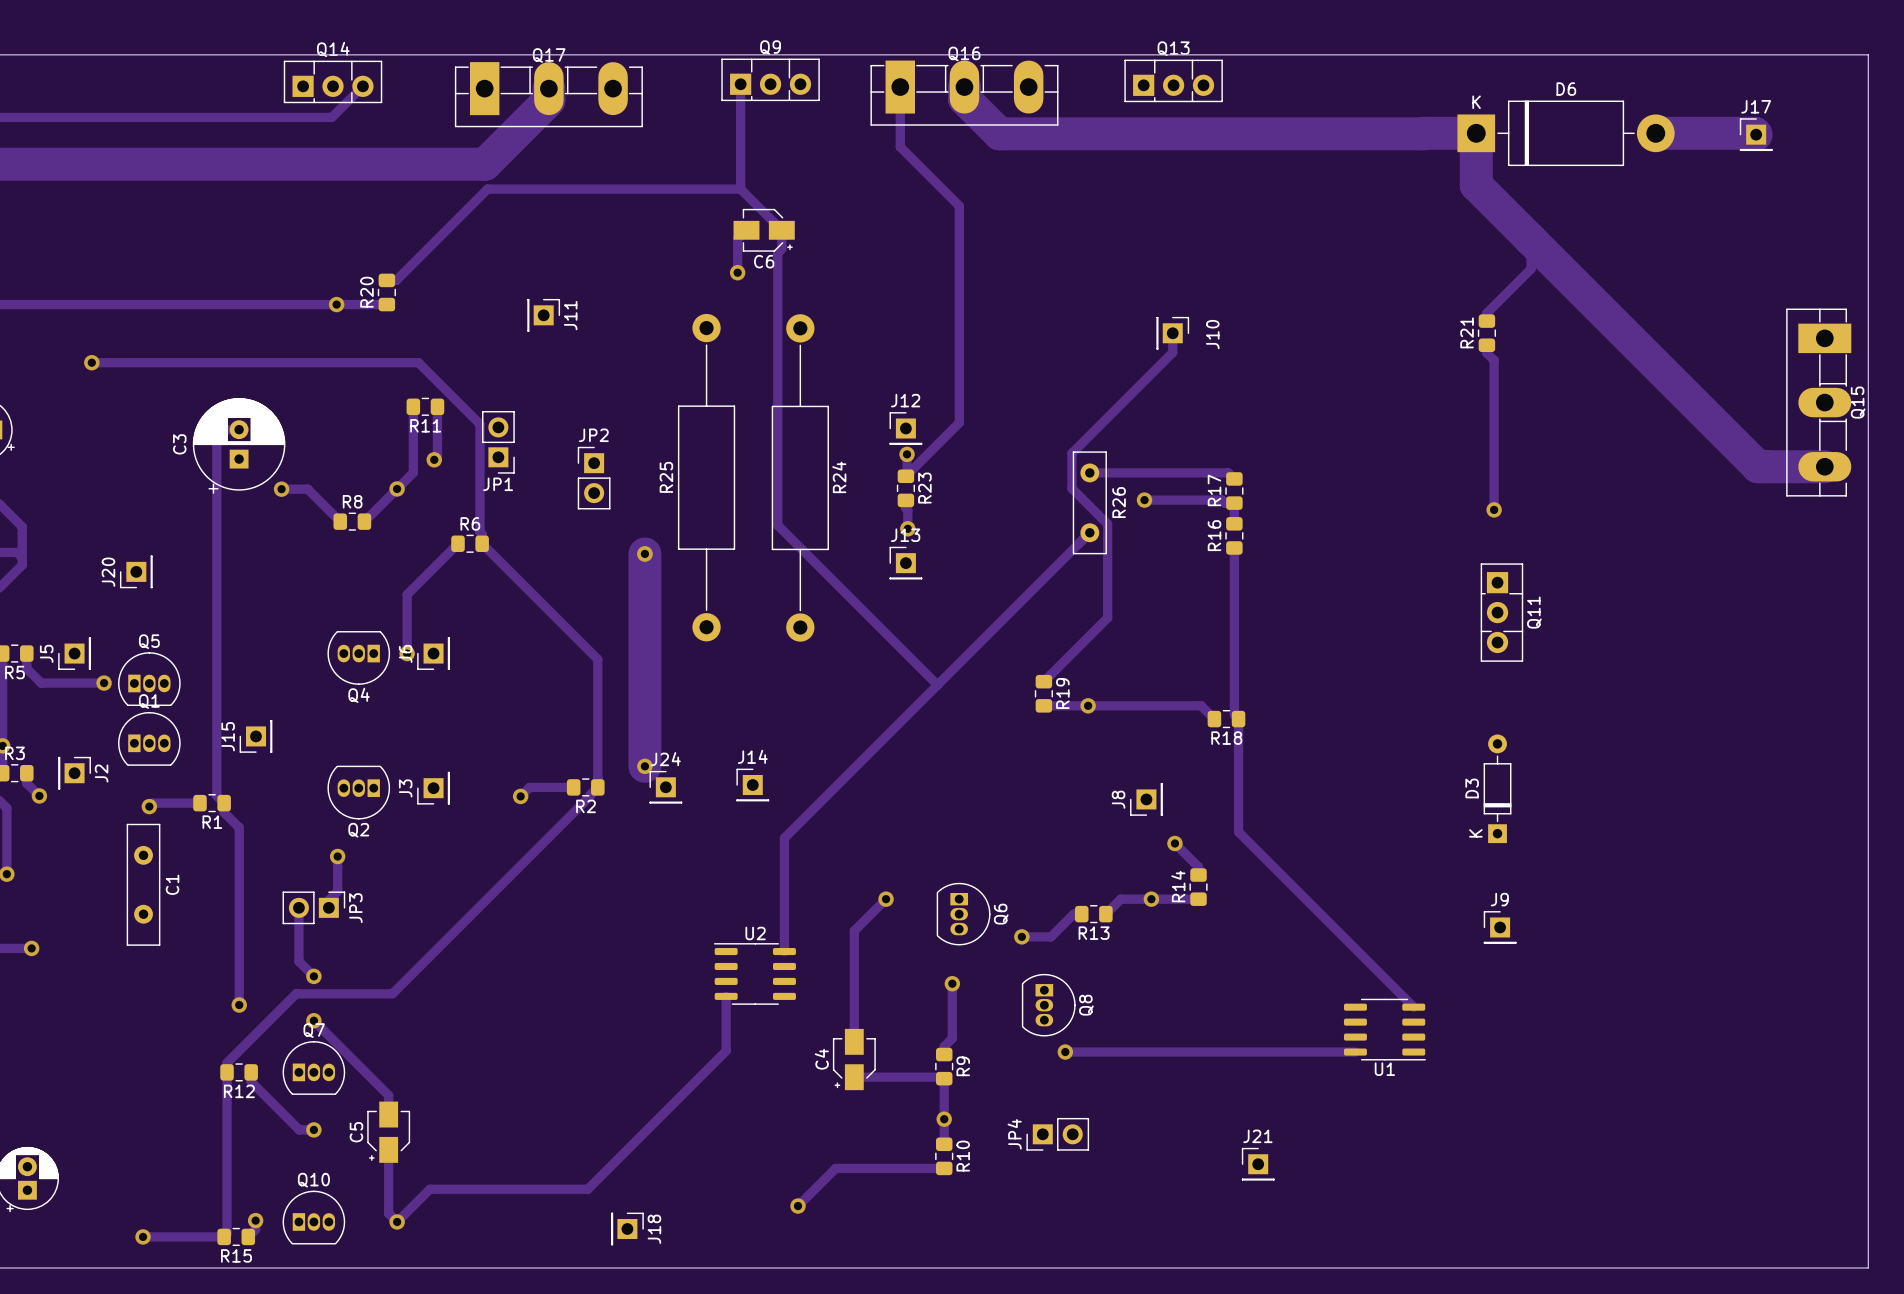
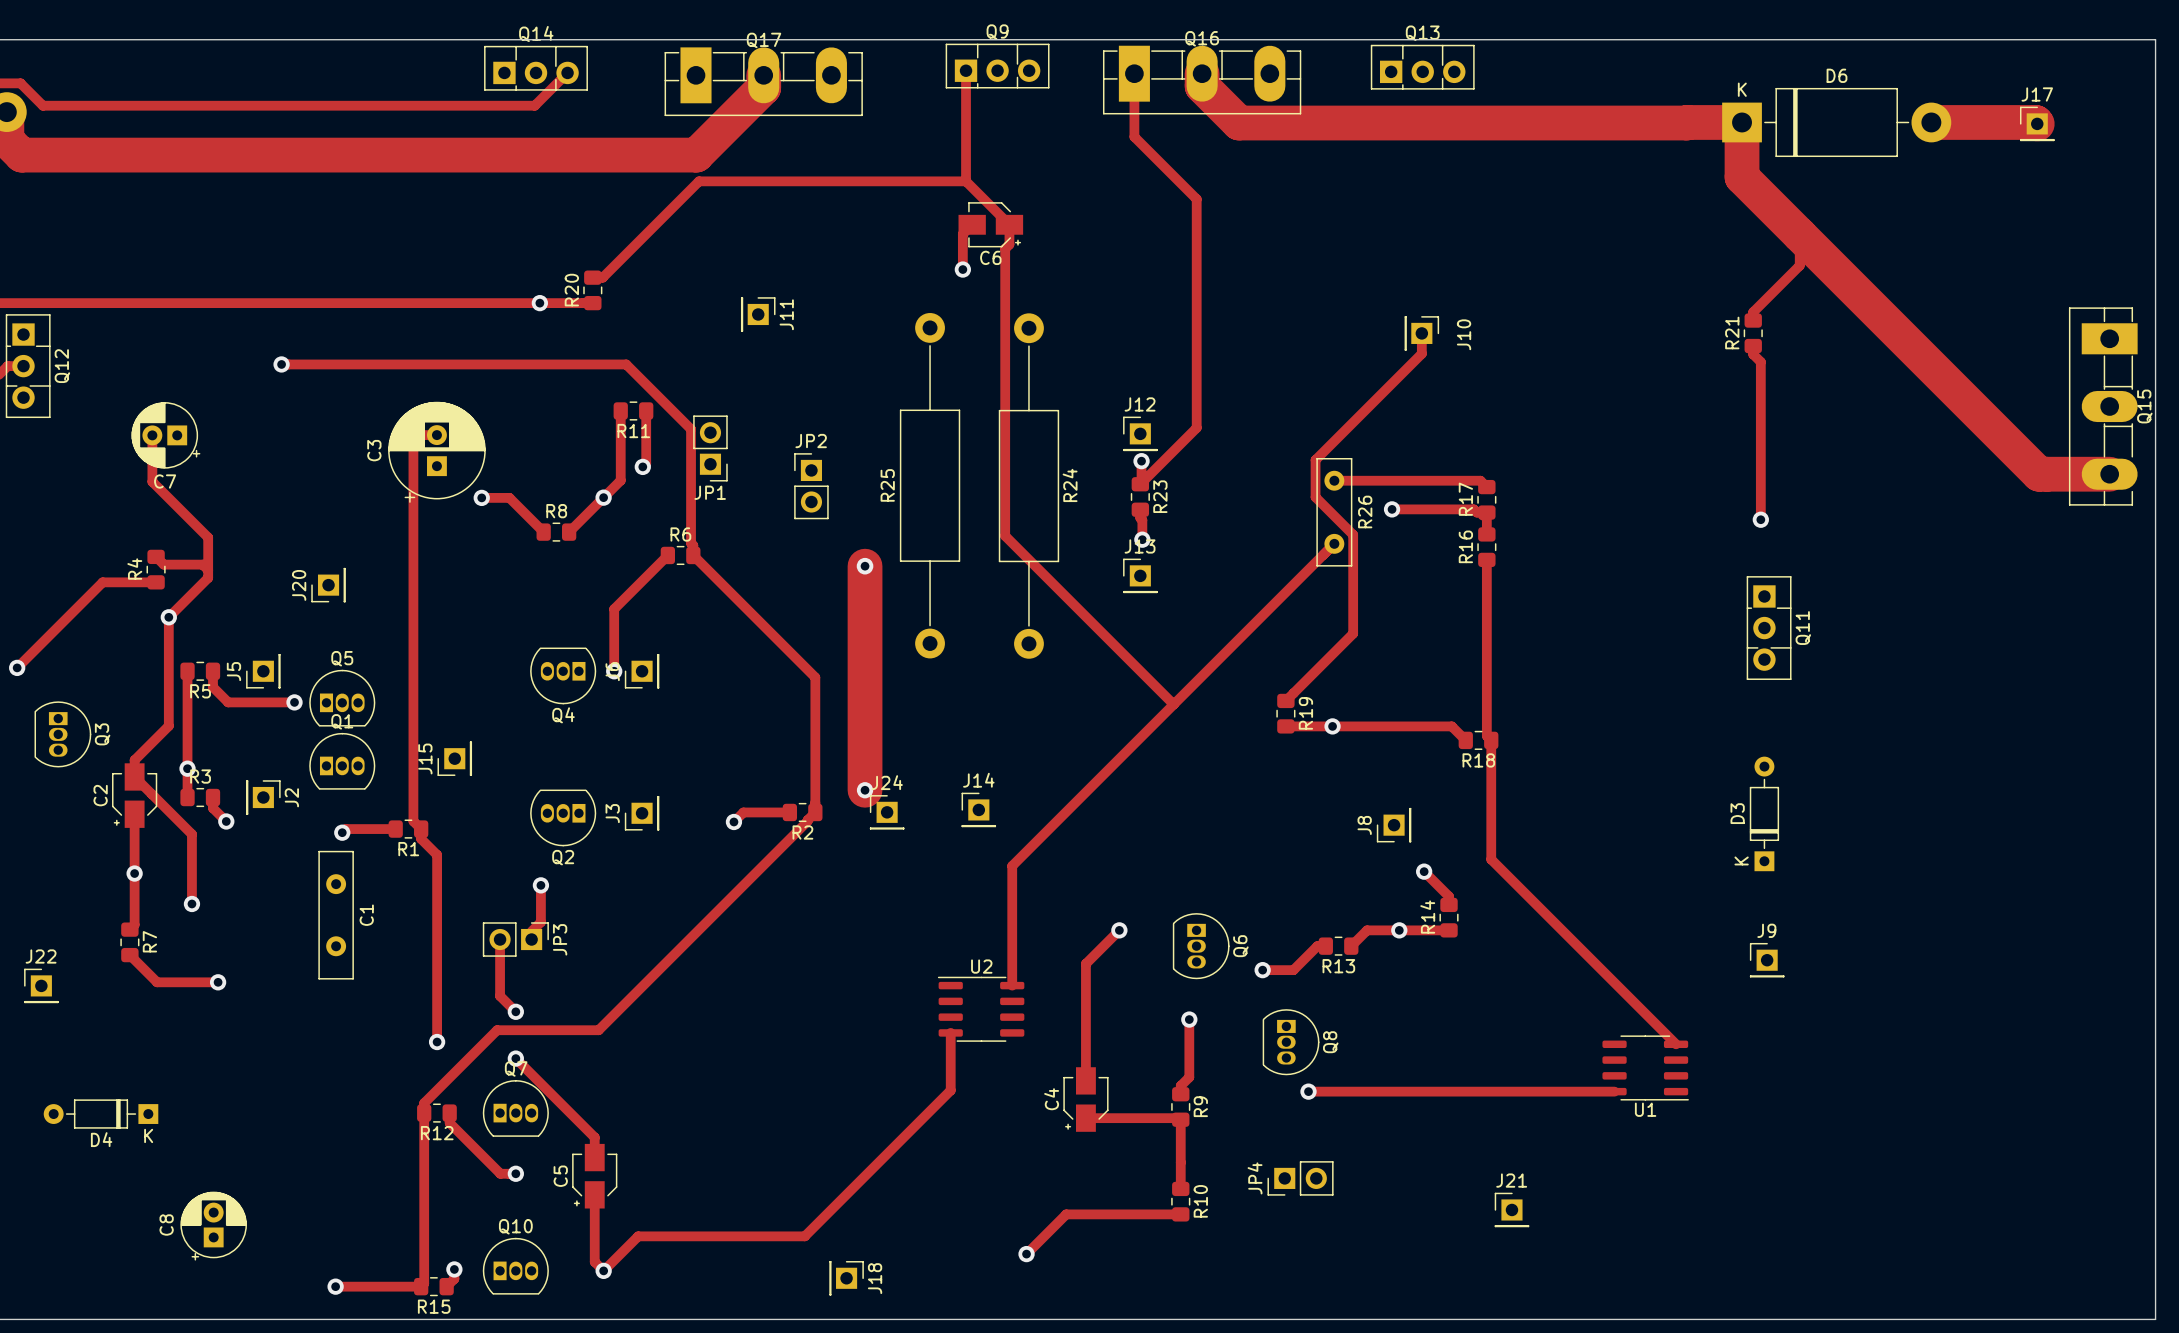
via: (944, 1119) -> none

